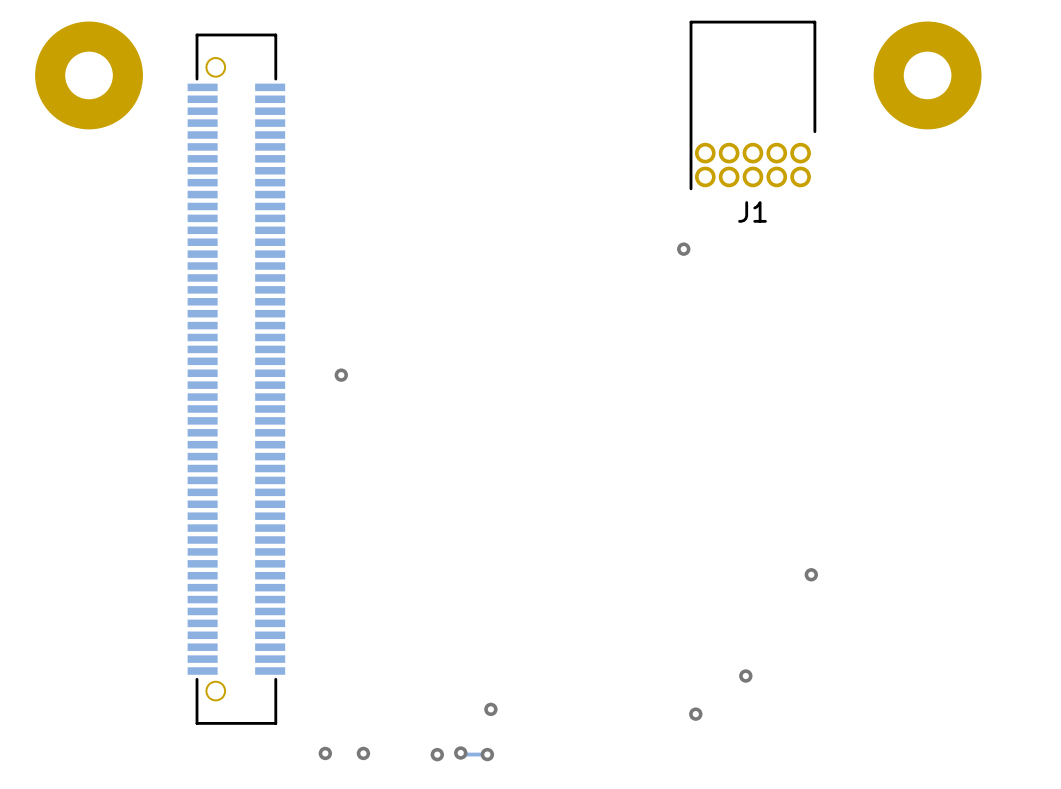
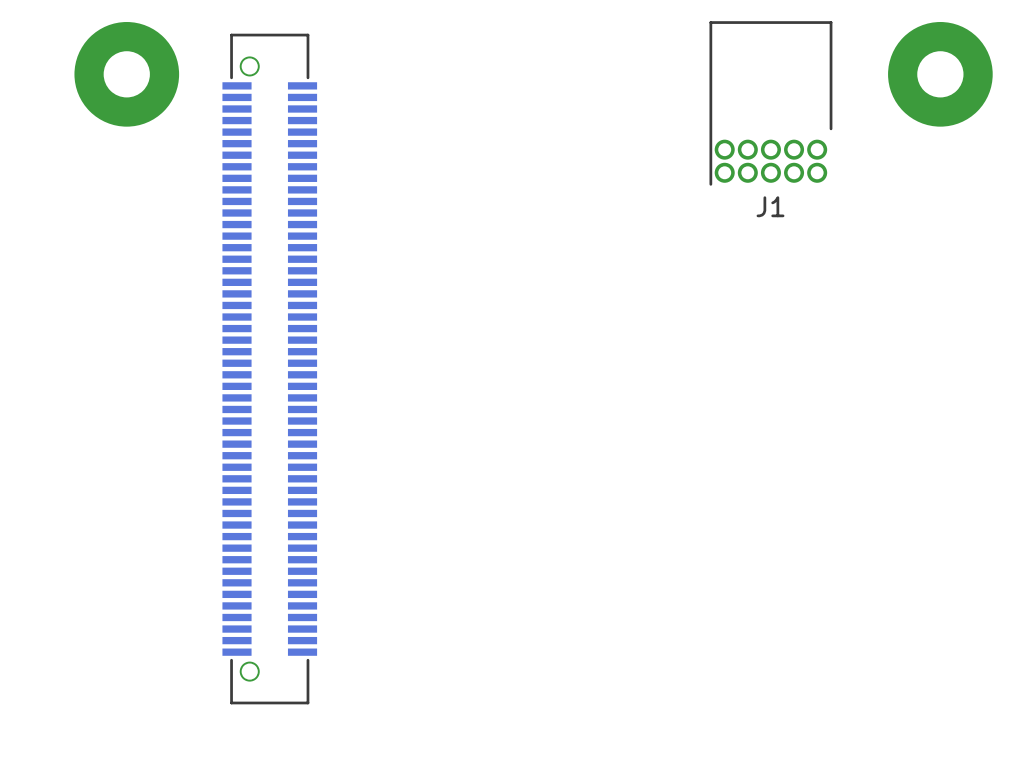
via: (683, 249) -> none
via: (341, 375) -> none
via: (811, 574) -> none
via: (745, 676) -> none
via: (490, 709) -> none
via: (695, 714) -> none
via: (325, 753) -> none
via: (363, 753) -> none
track: (460, 753) (487, 754) -> none
via: (460, 753) -> none
via: (437, 754) -> none
via: (487, 754) -> none

